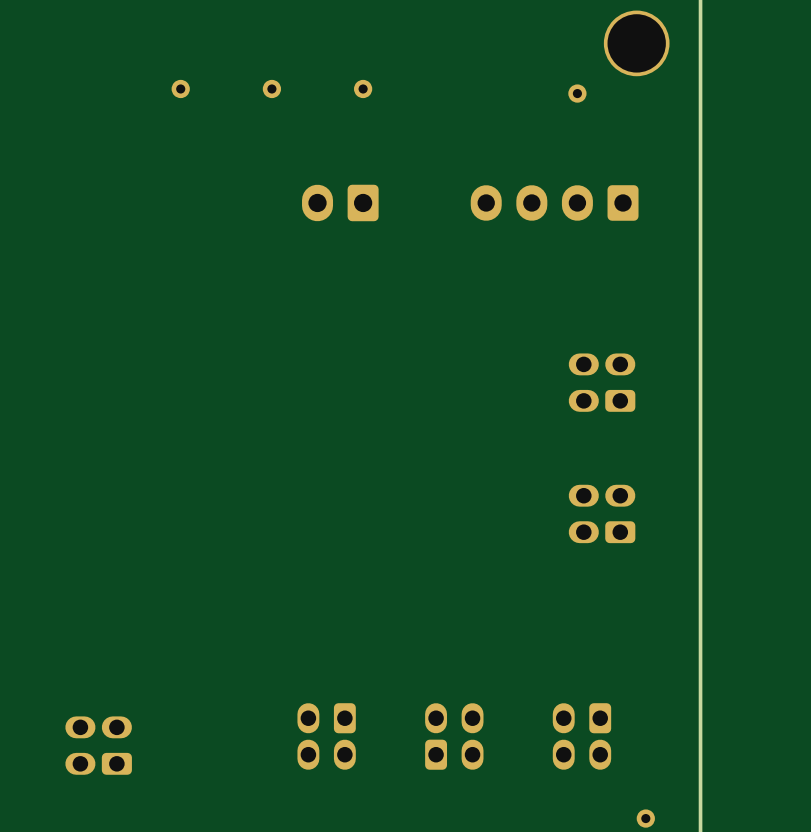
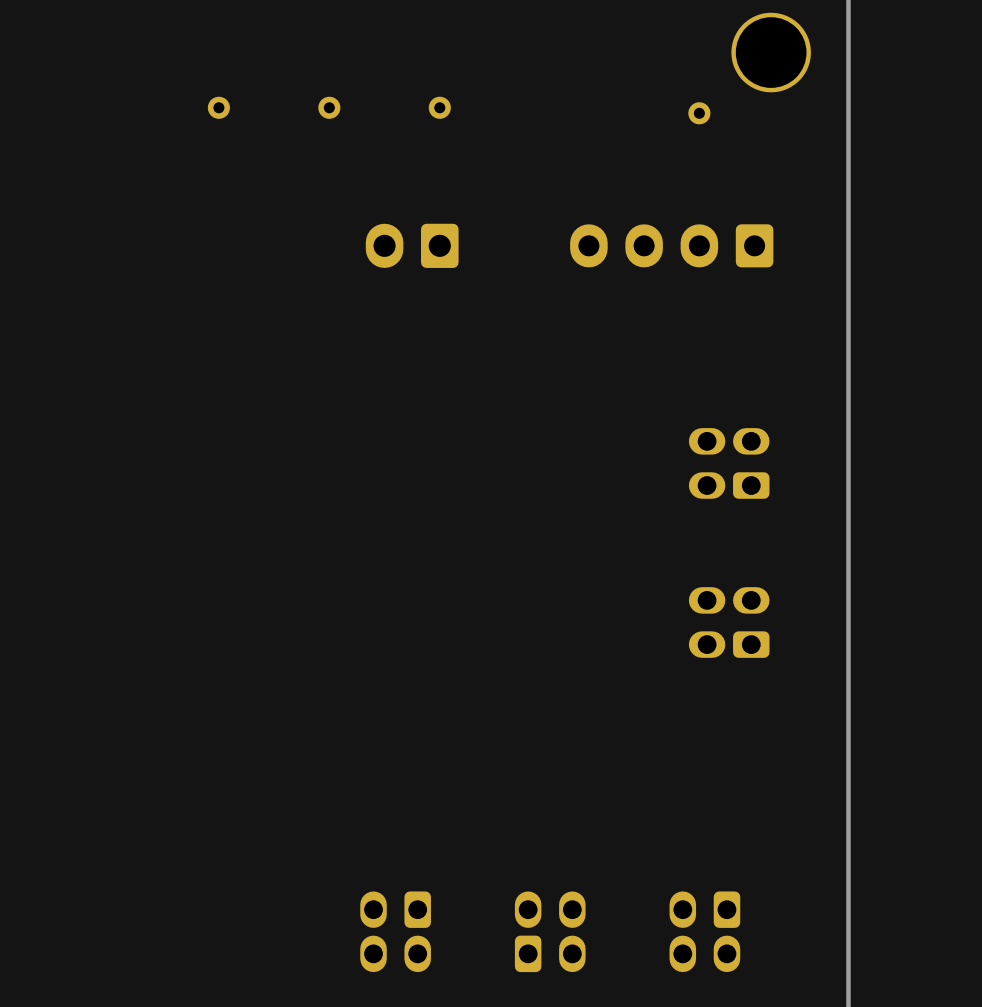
part position: (326, 736) -> (395, 931)
part position: (454, 736) -> (550, 931)
part position: (581, 736) -> (704, 931)
part: (98, 745) -> none
part: (645, 818) -> none

